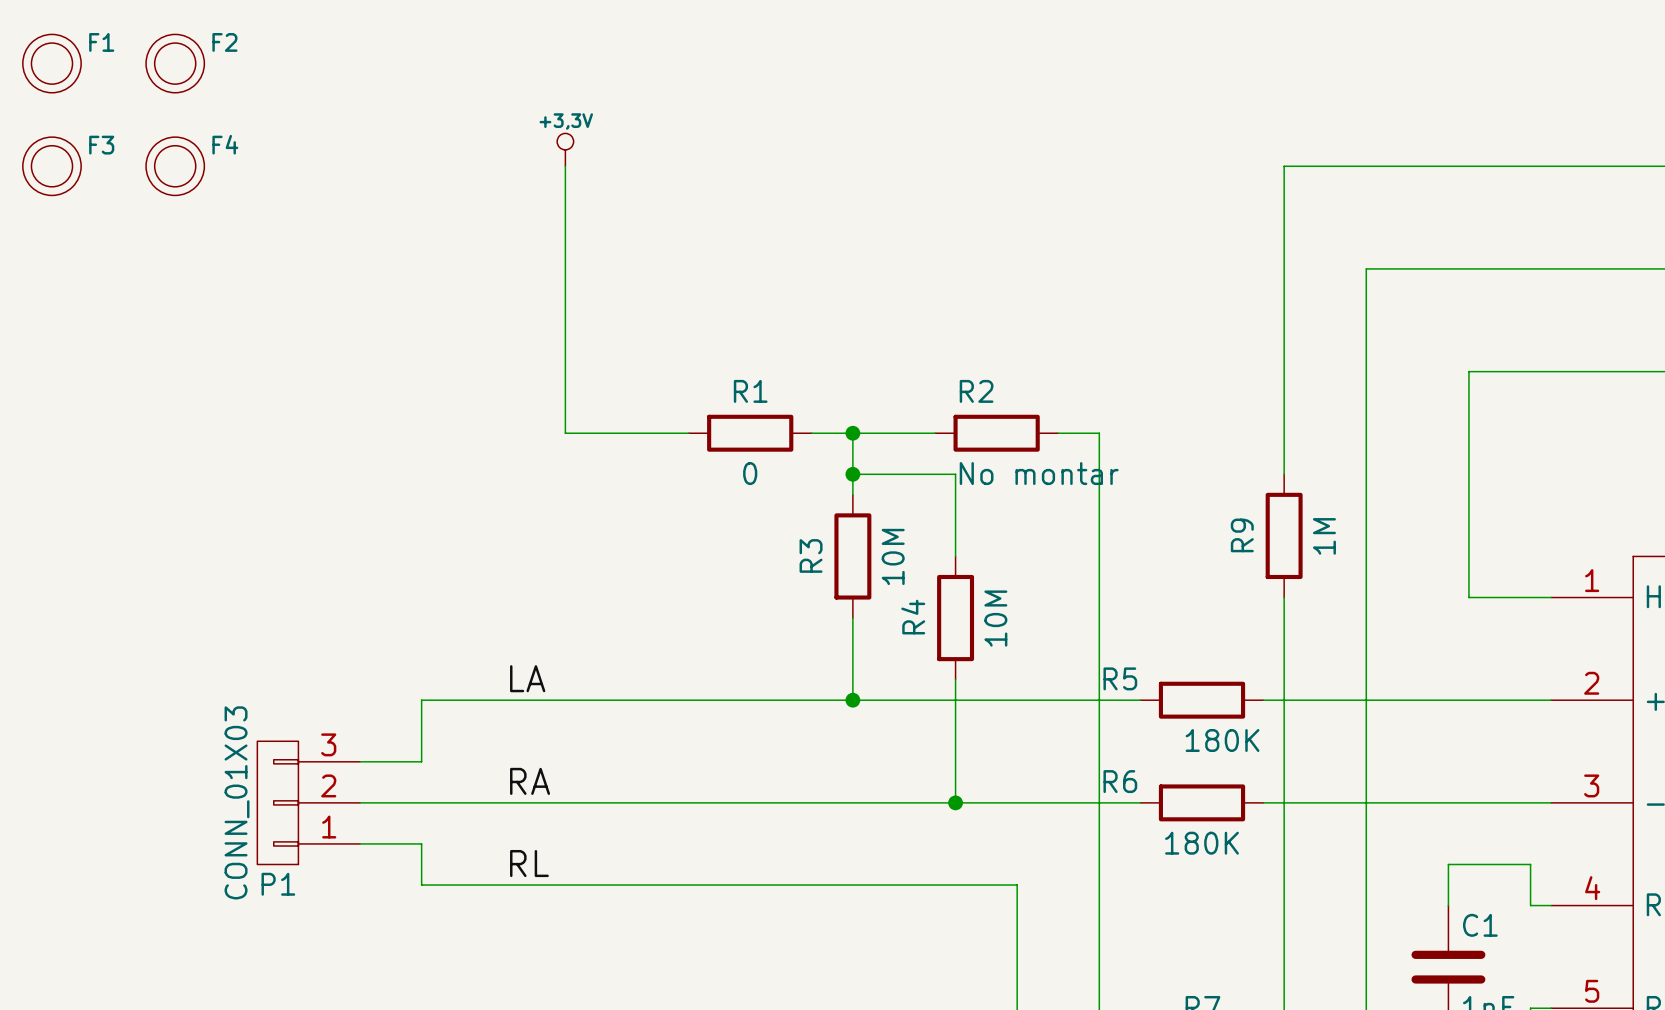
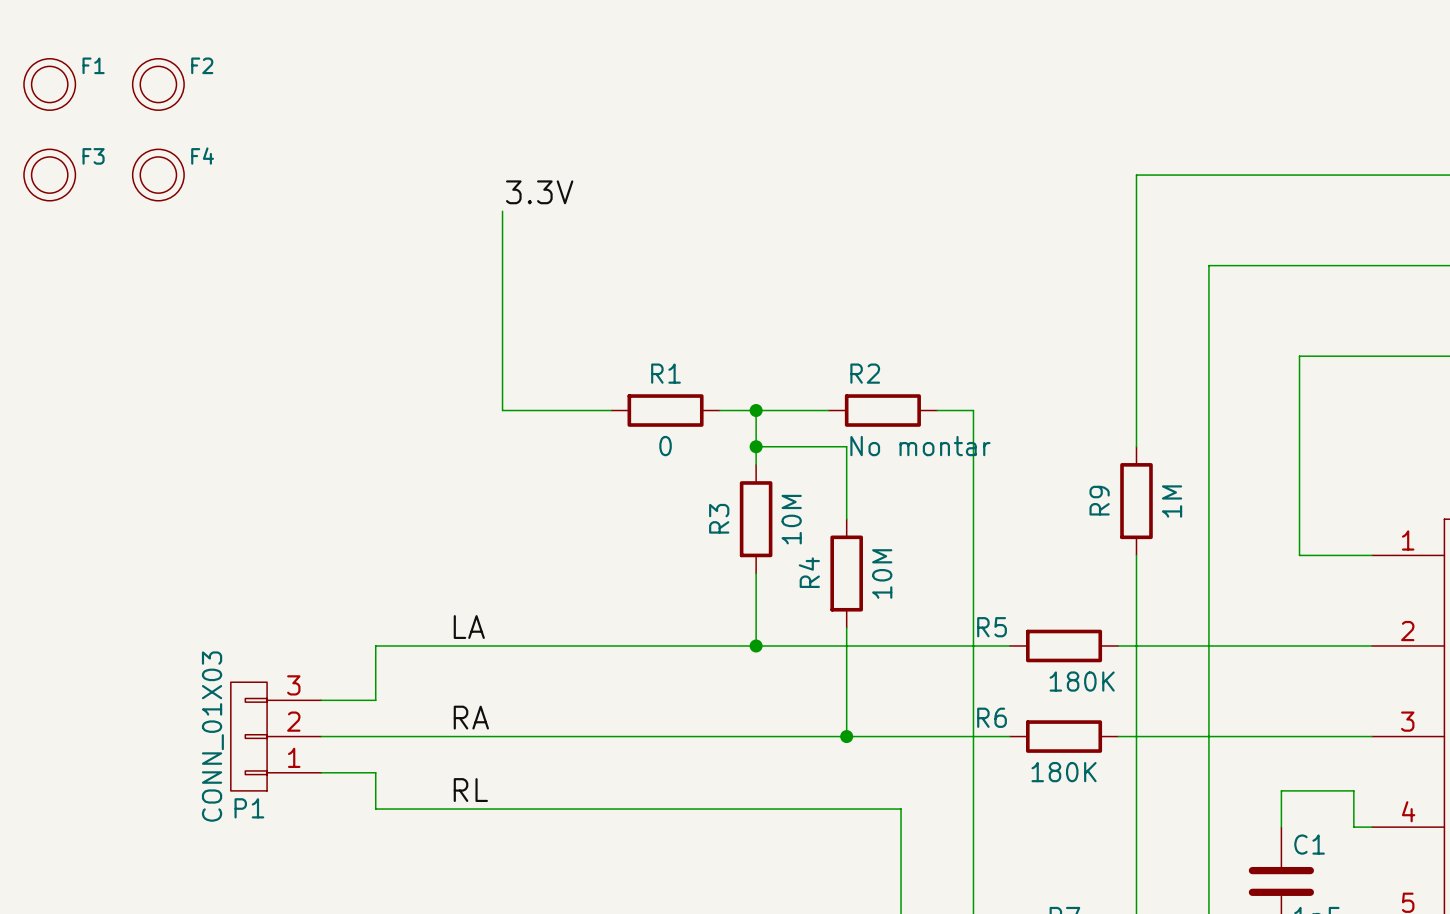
power symbol: +3,3V (565, 149) -> none
wire: (565, 166) (565, 207) -> none
label: none -> 3.3V (539, 192)

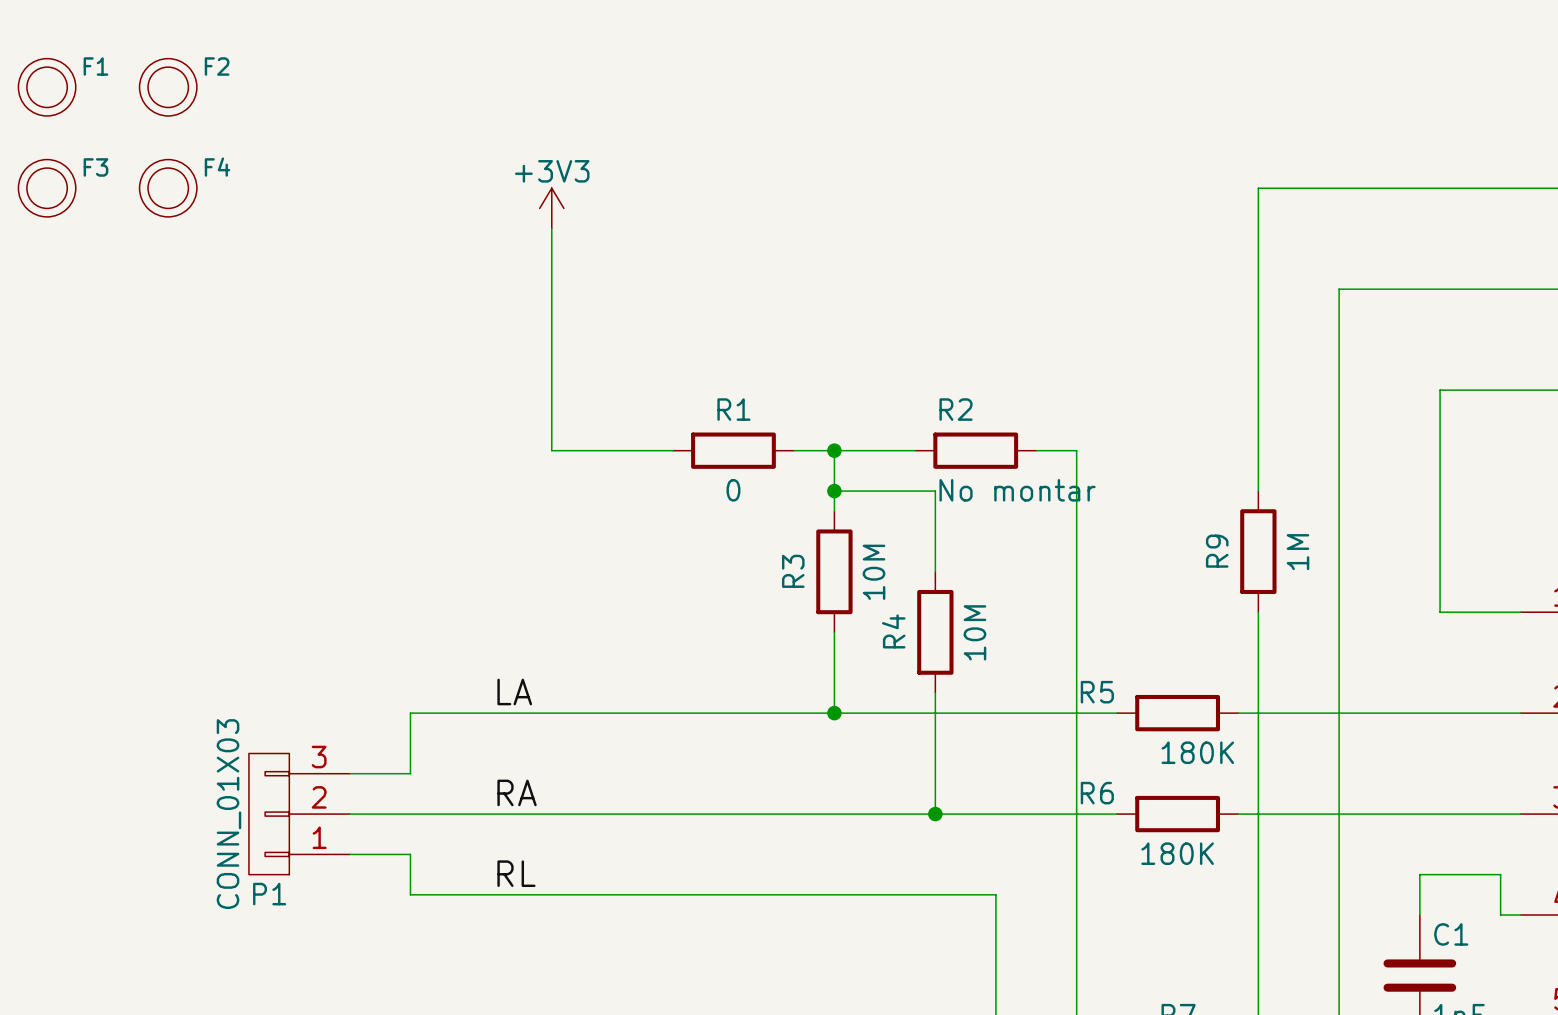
label: 3.3V (539, 192) -> none
power symbol: none -> +3V3 (551, 208)

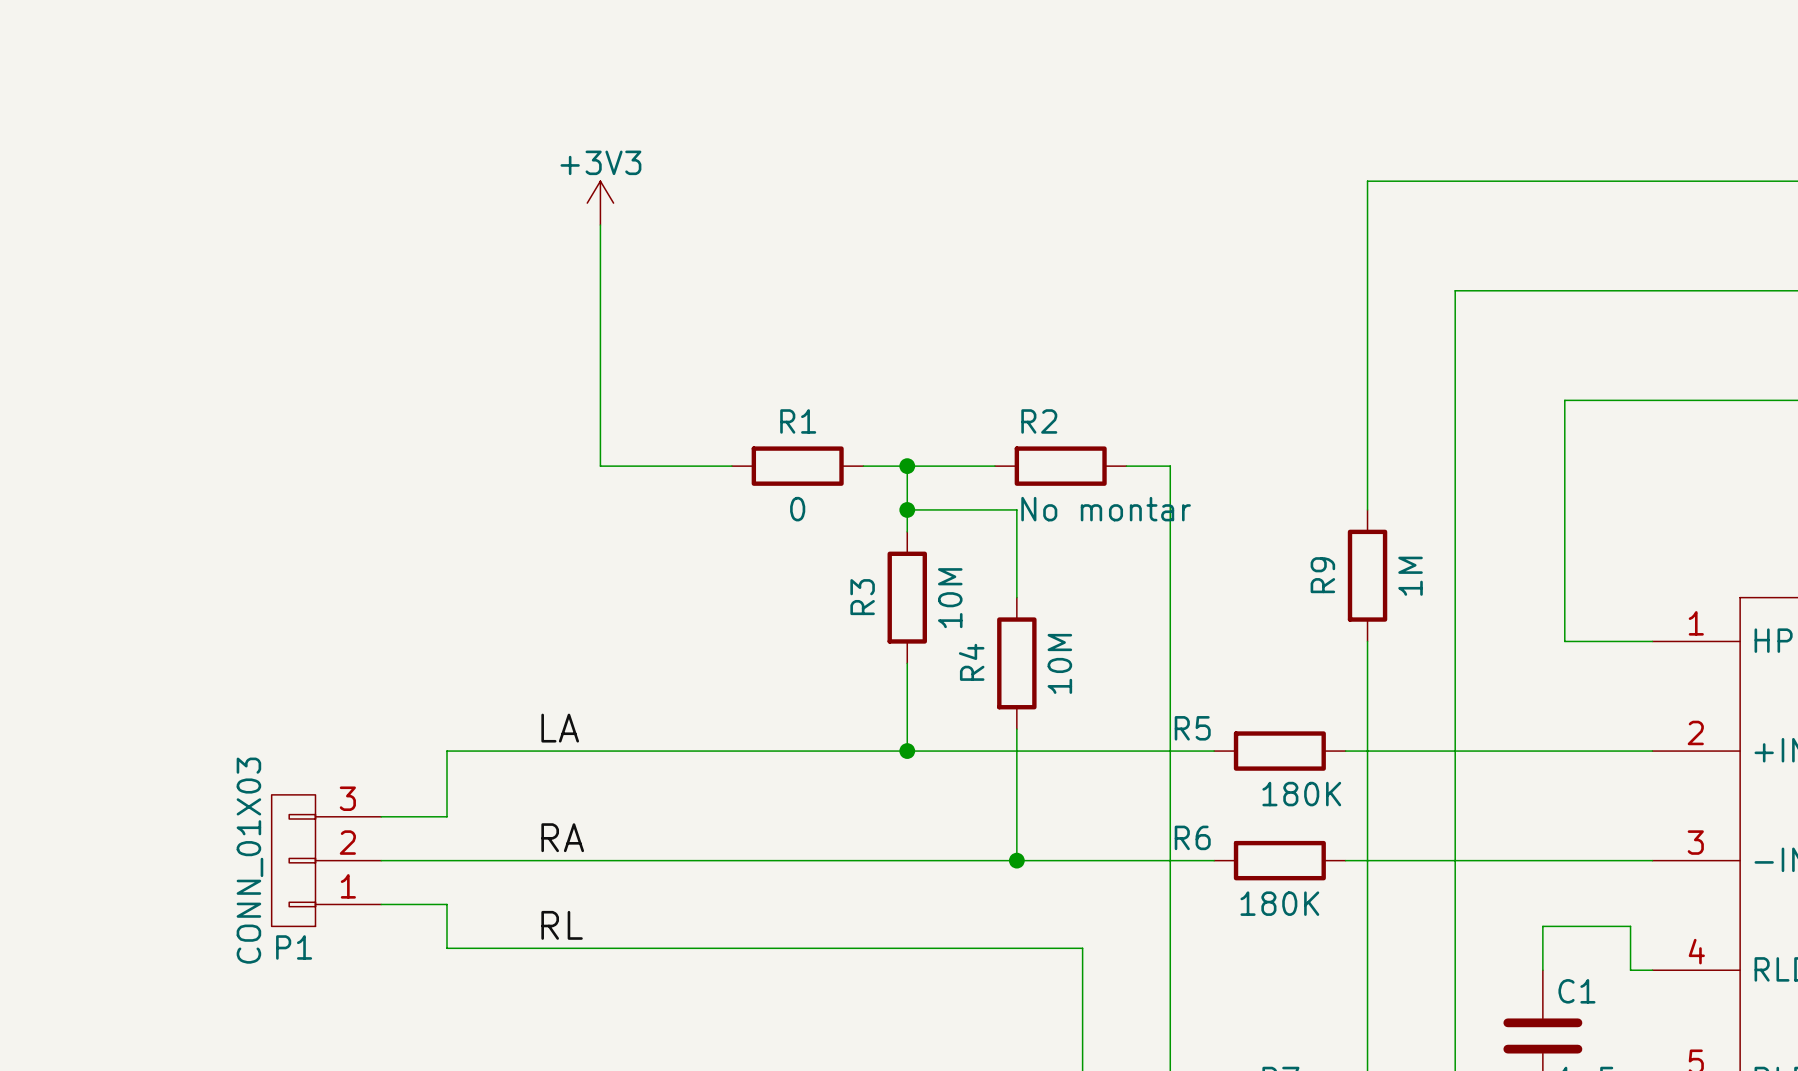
F1: (47, 87) -> none
F2: (168, 87) -> none
F3: (47, 188) -> none
F4: (168, 188) -> none

